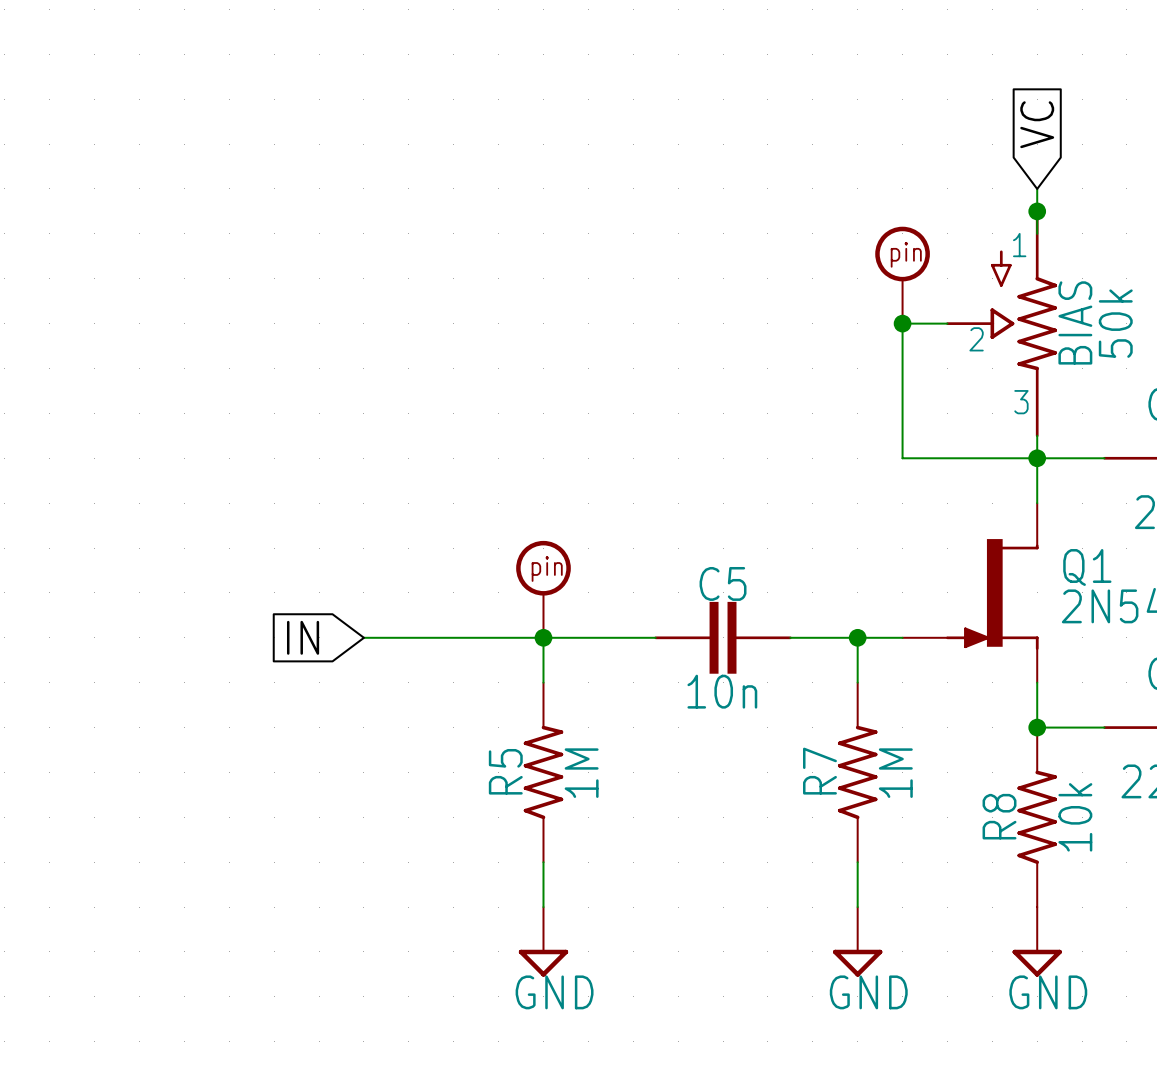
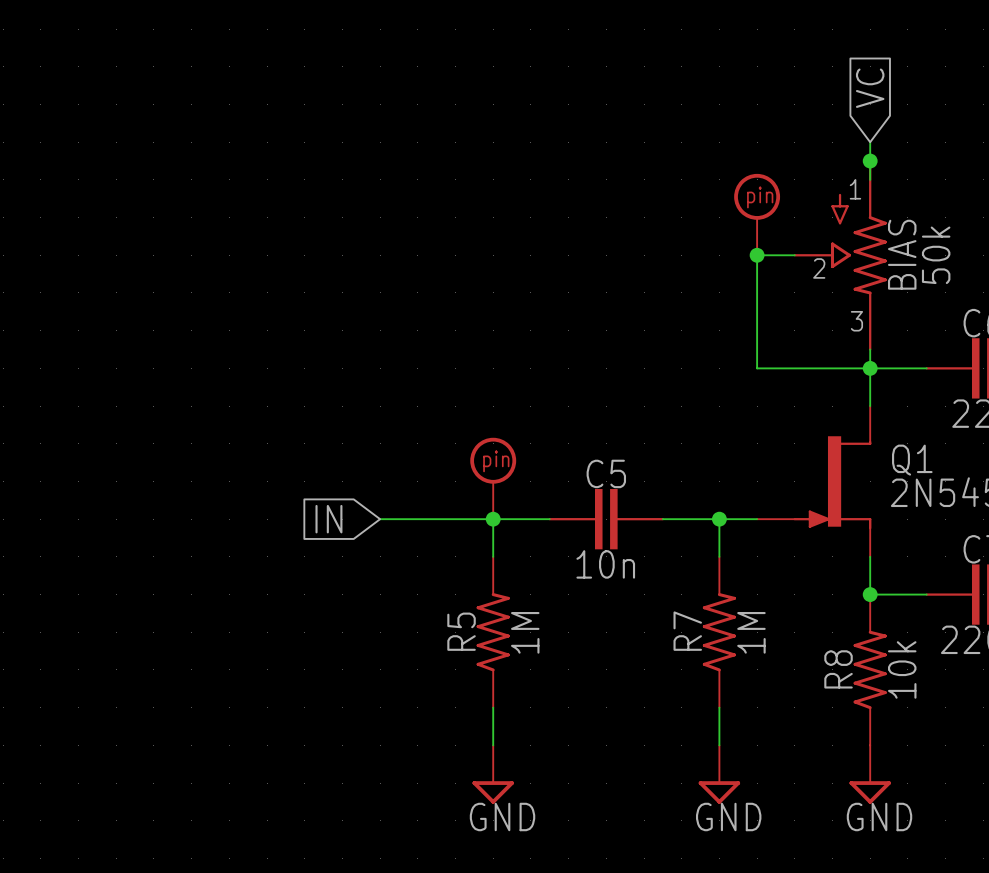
part position: (543, 589) -> (493, 478)
global label position: IN (303, 637) -> IN (328, 519)
wire: (363, 637) (453, 637) -> none
wire: (543, 637) (543, 682) -> (493, 519) (493, 556)
junction position: (543, 637) -> (493, 519)
R5 position: (543, 772) -> (493, 632)
wire: (543, 862) (543, 907) -> (493, 707) (493, 745)
power symbol position: GND (543, 941) -> GND (493, 774)

